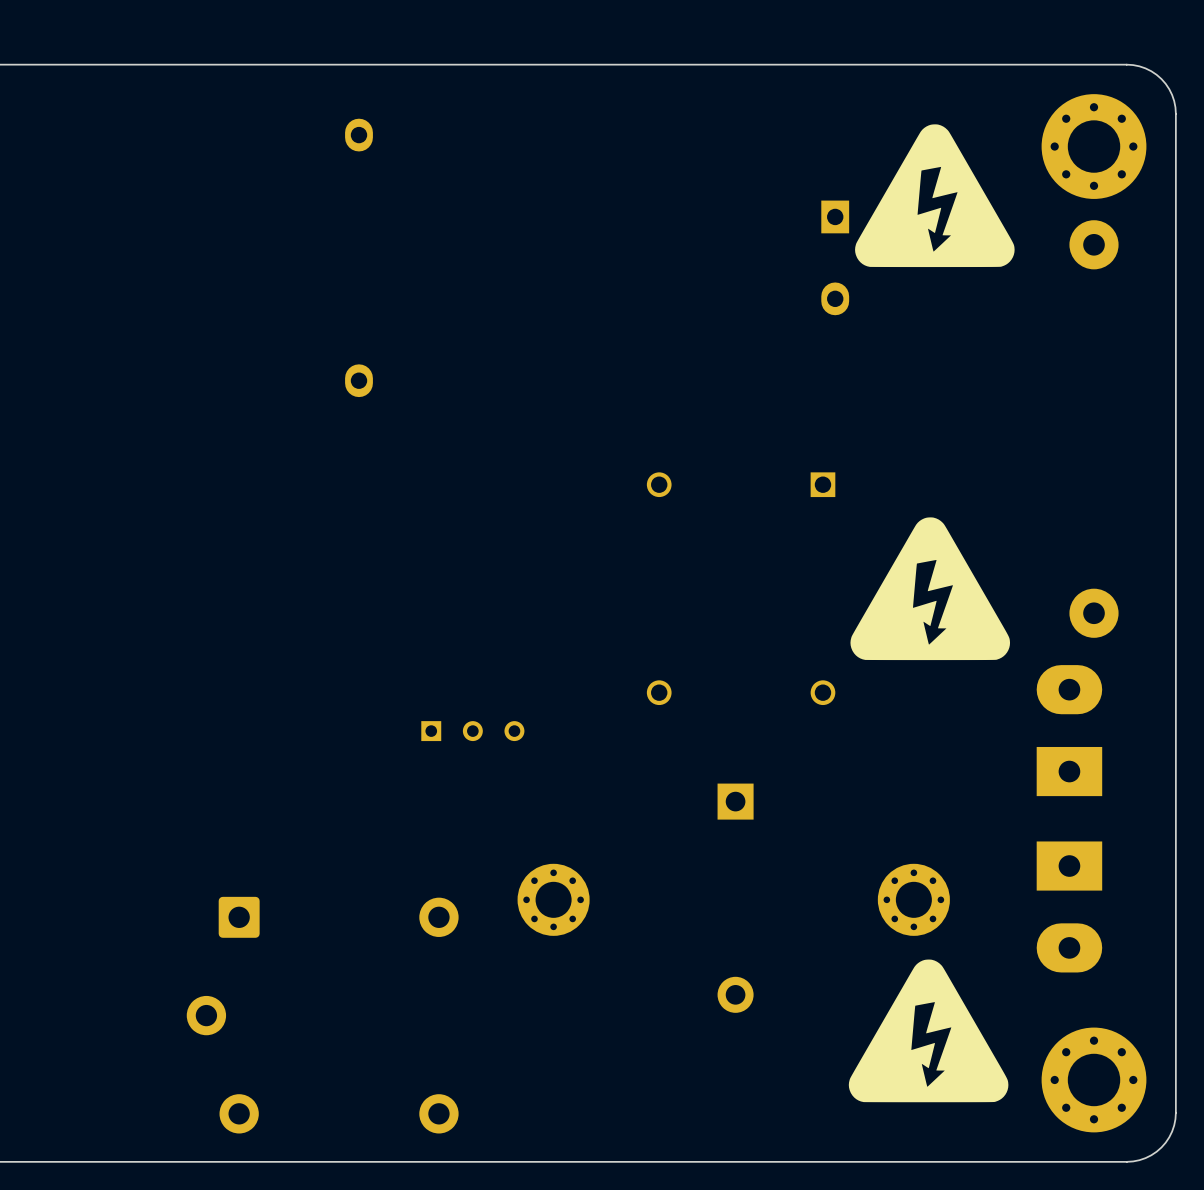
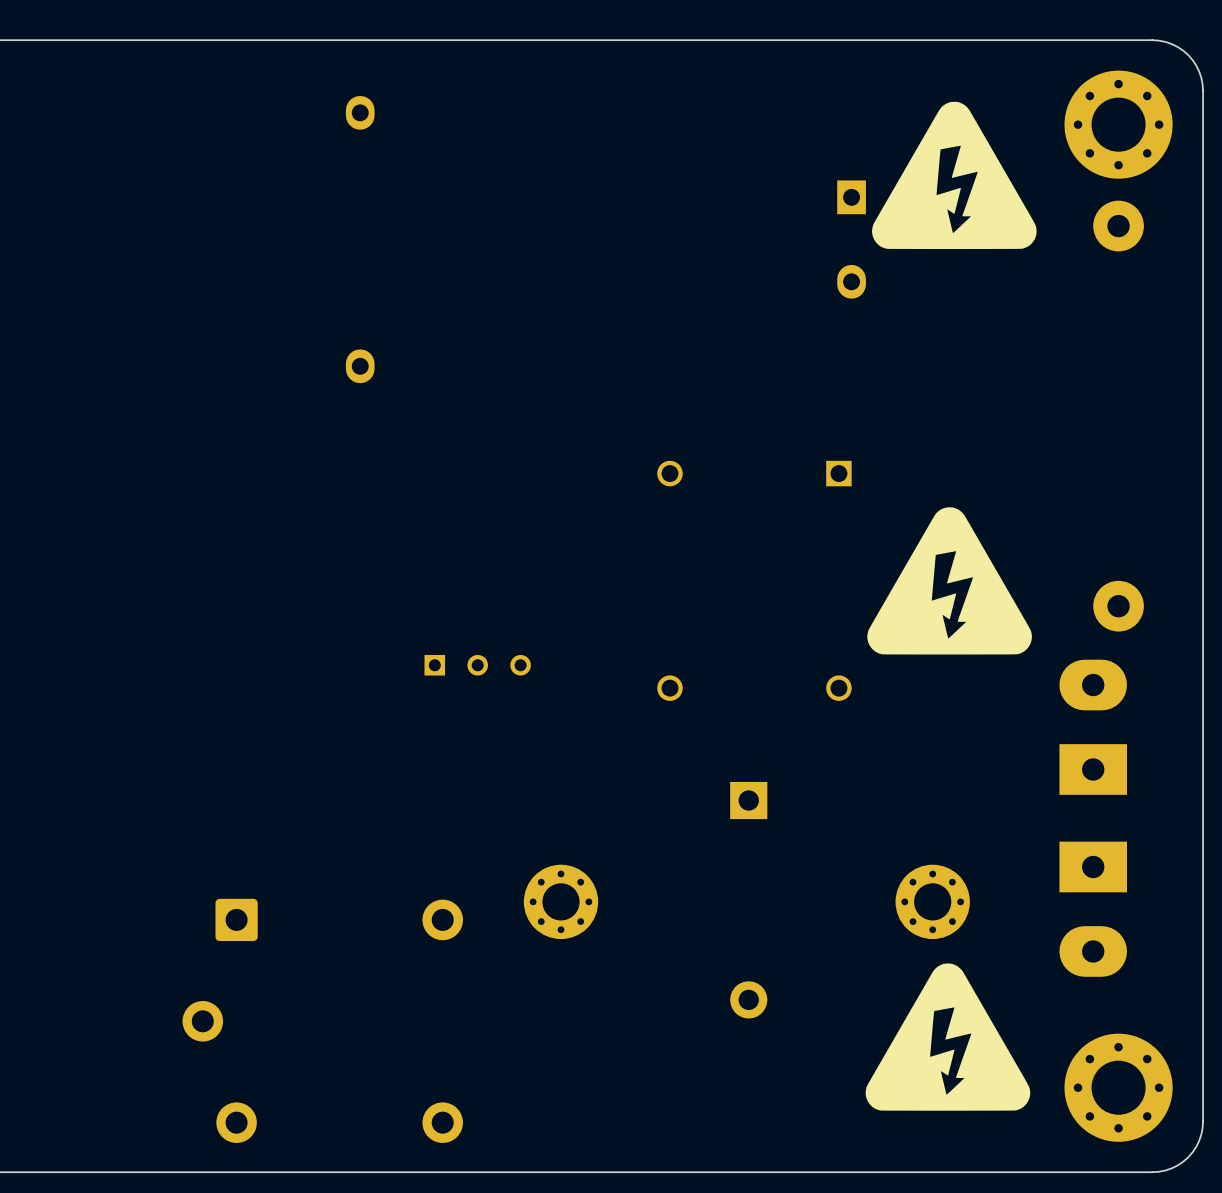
part position: (472, 731) -> (477, 665)

